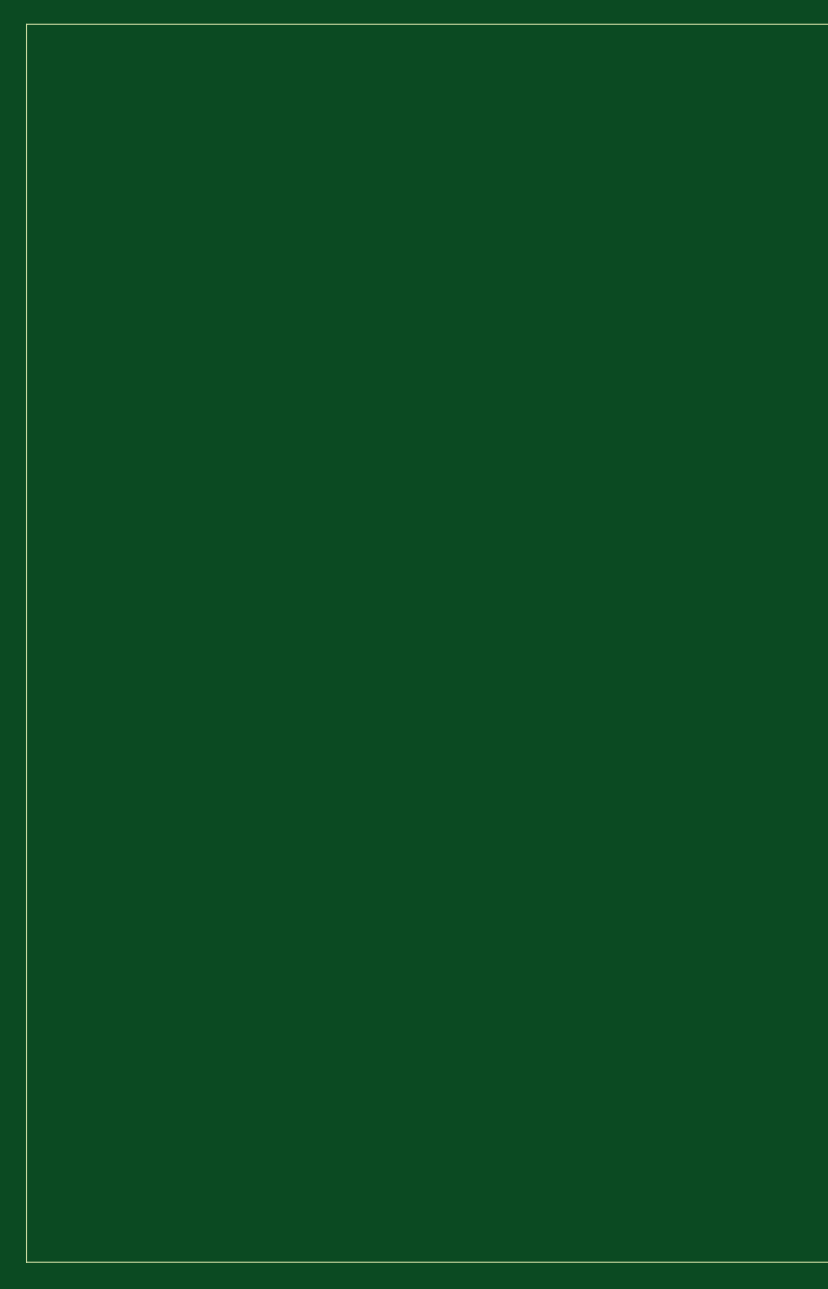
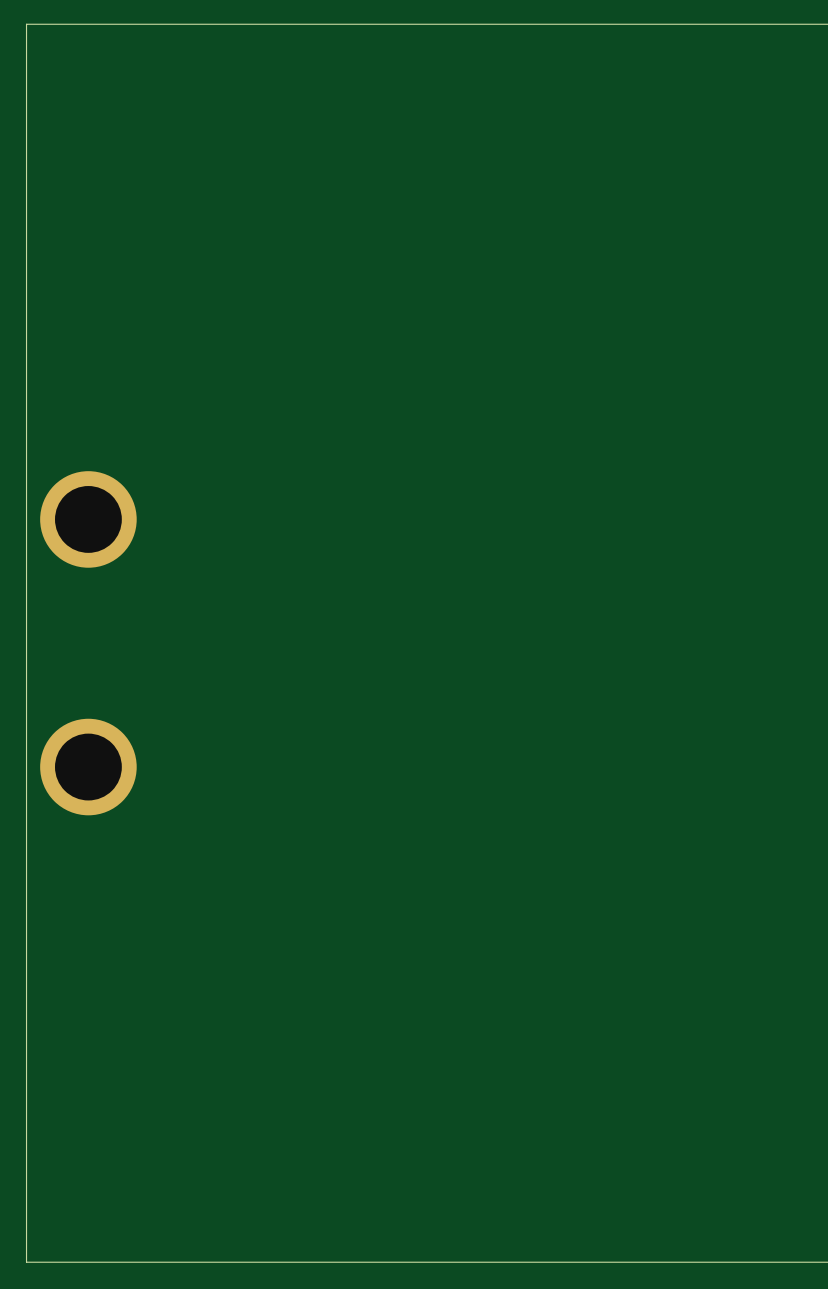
part: none -> (88, 519)
part: none -> (88, 767)

